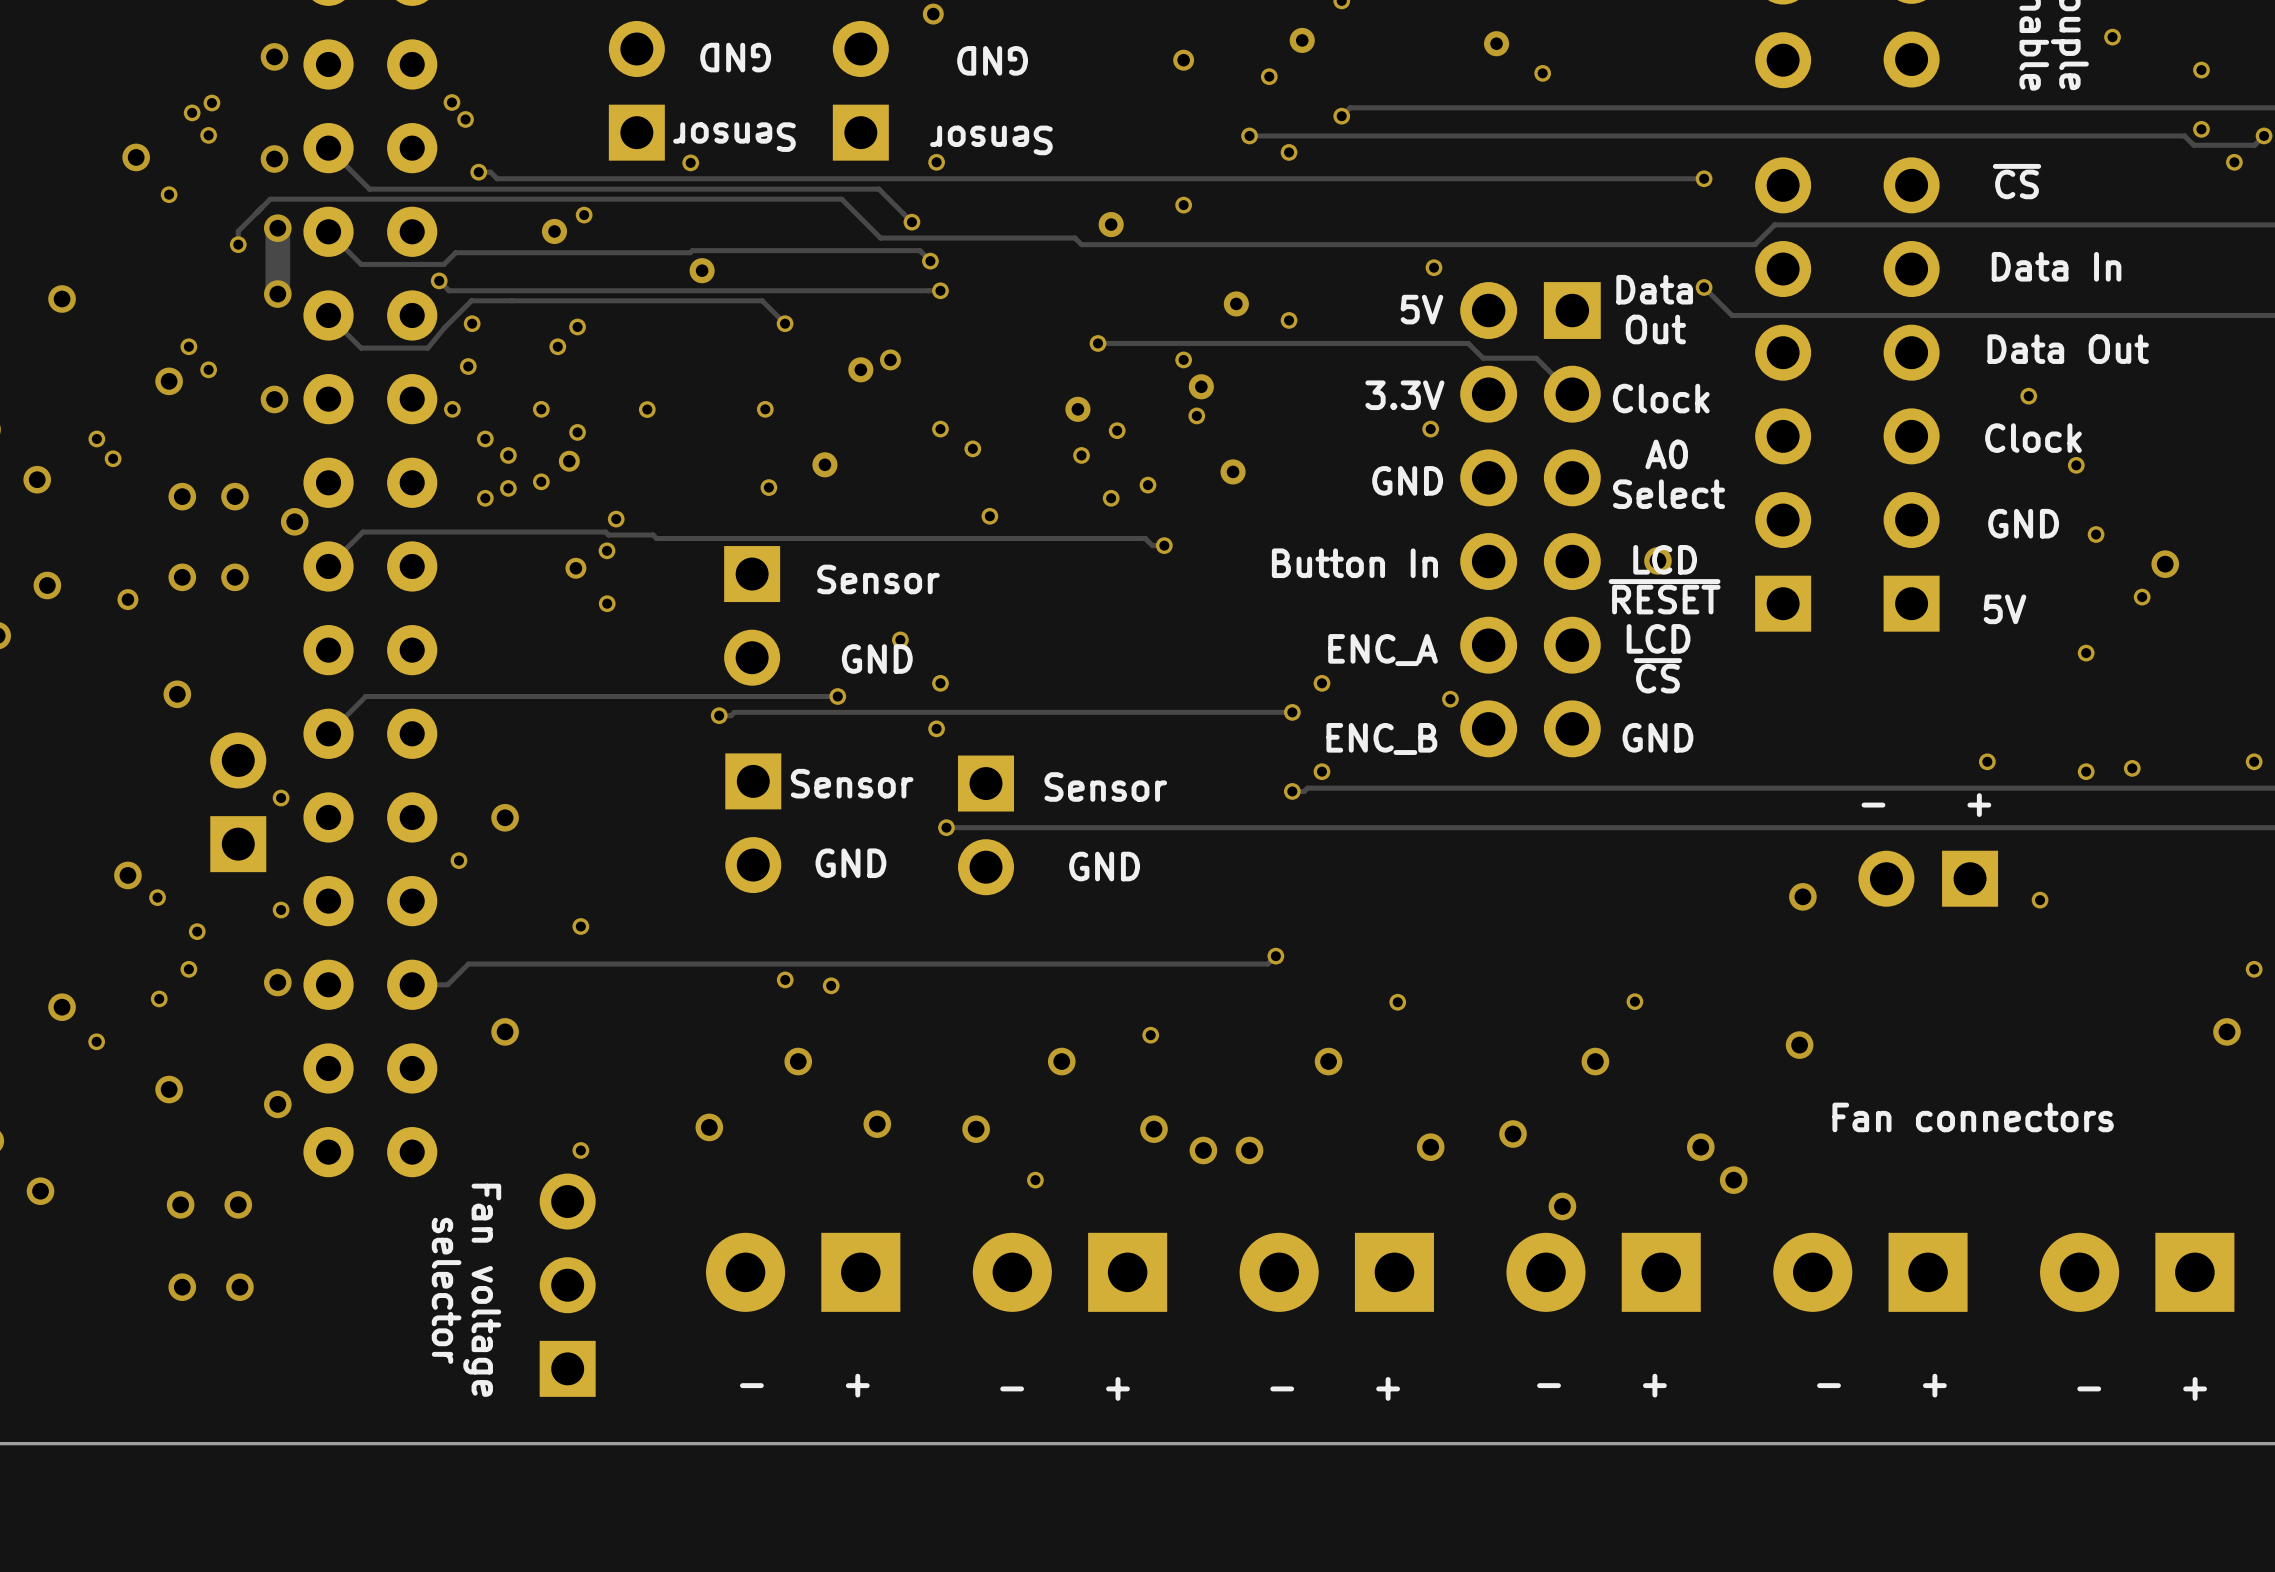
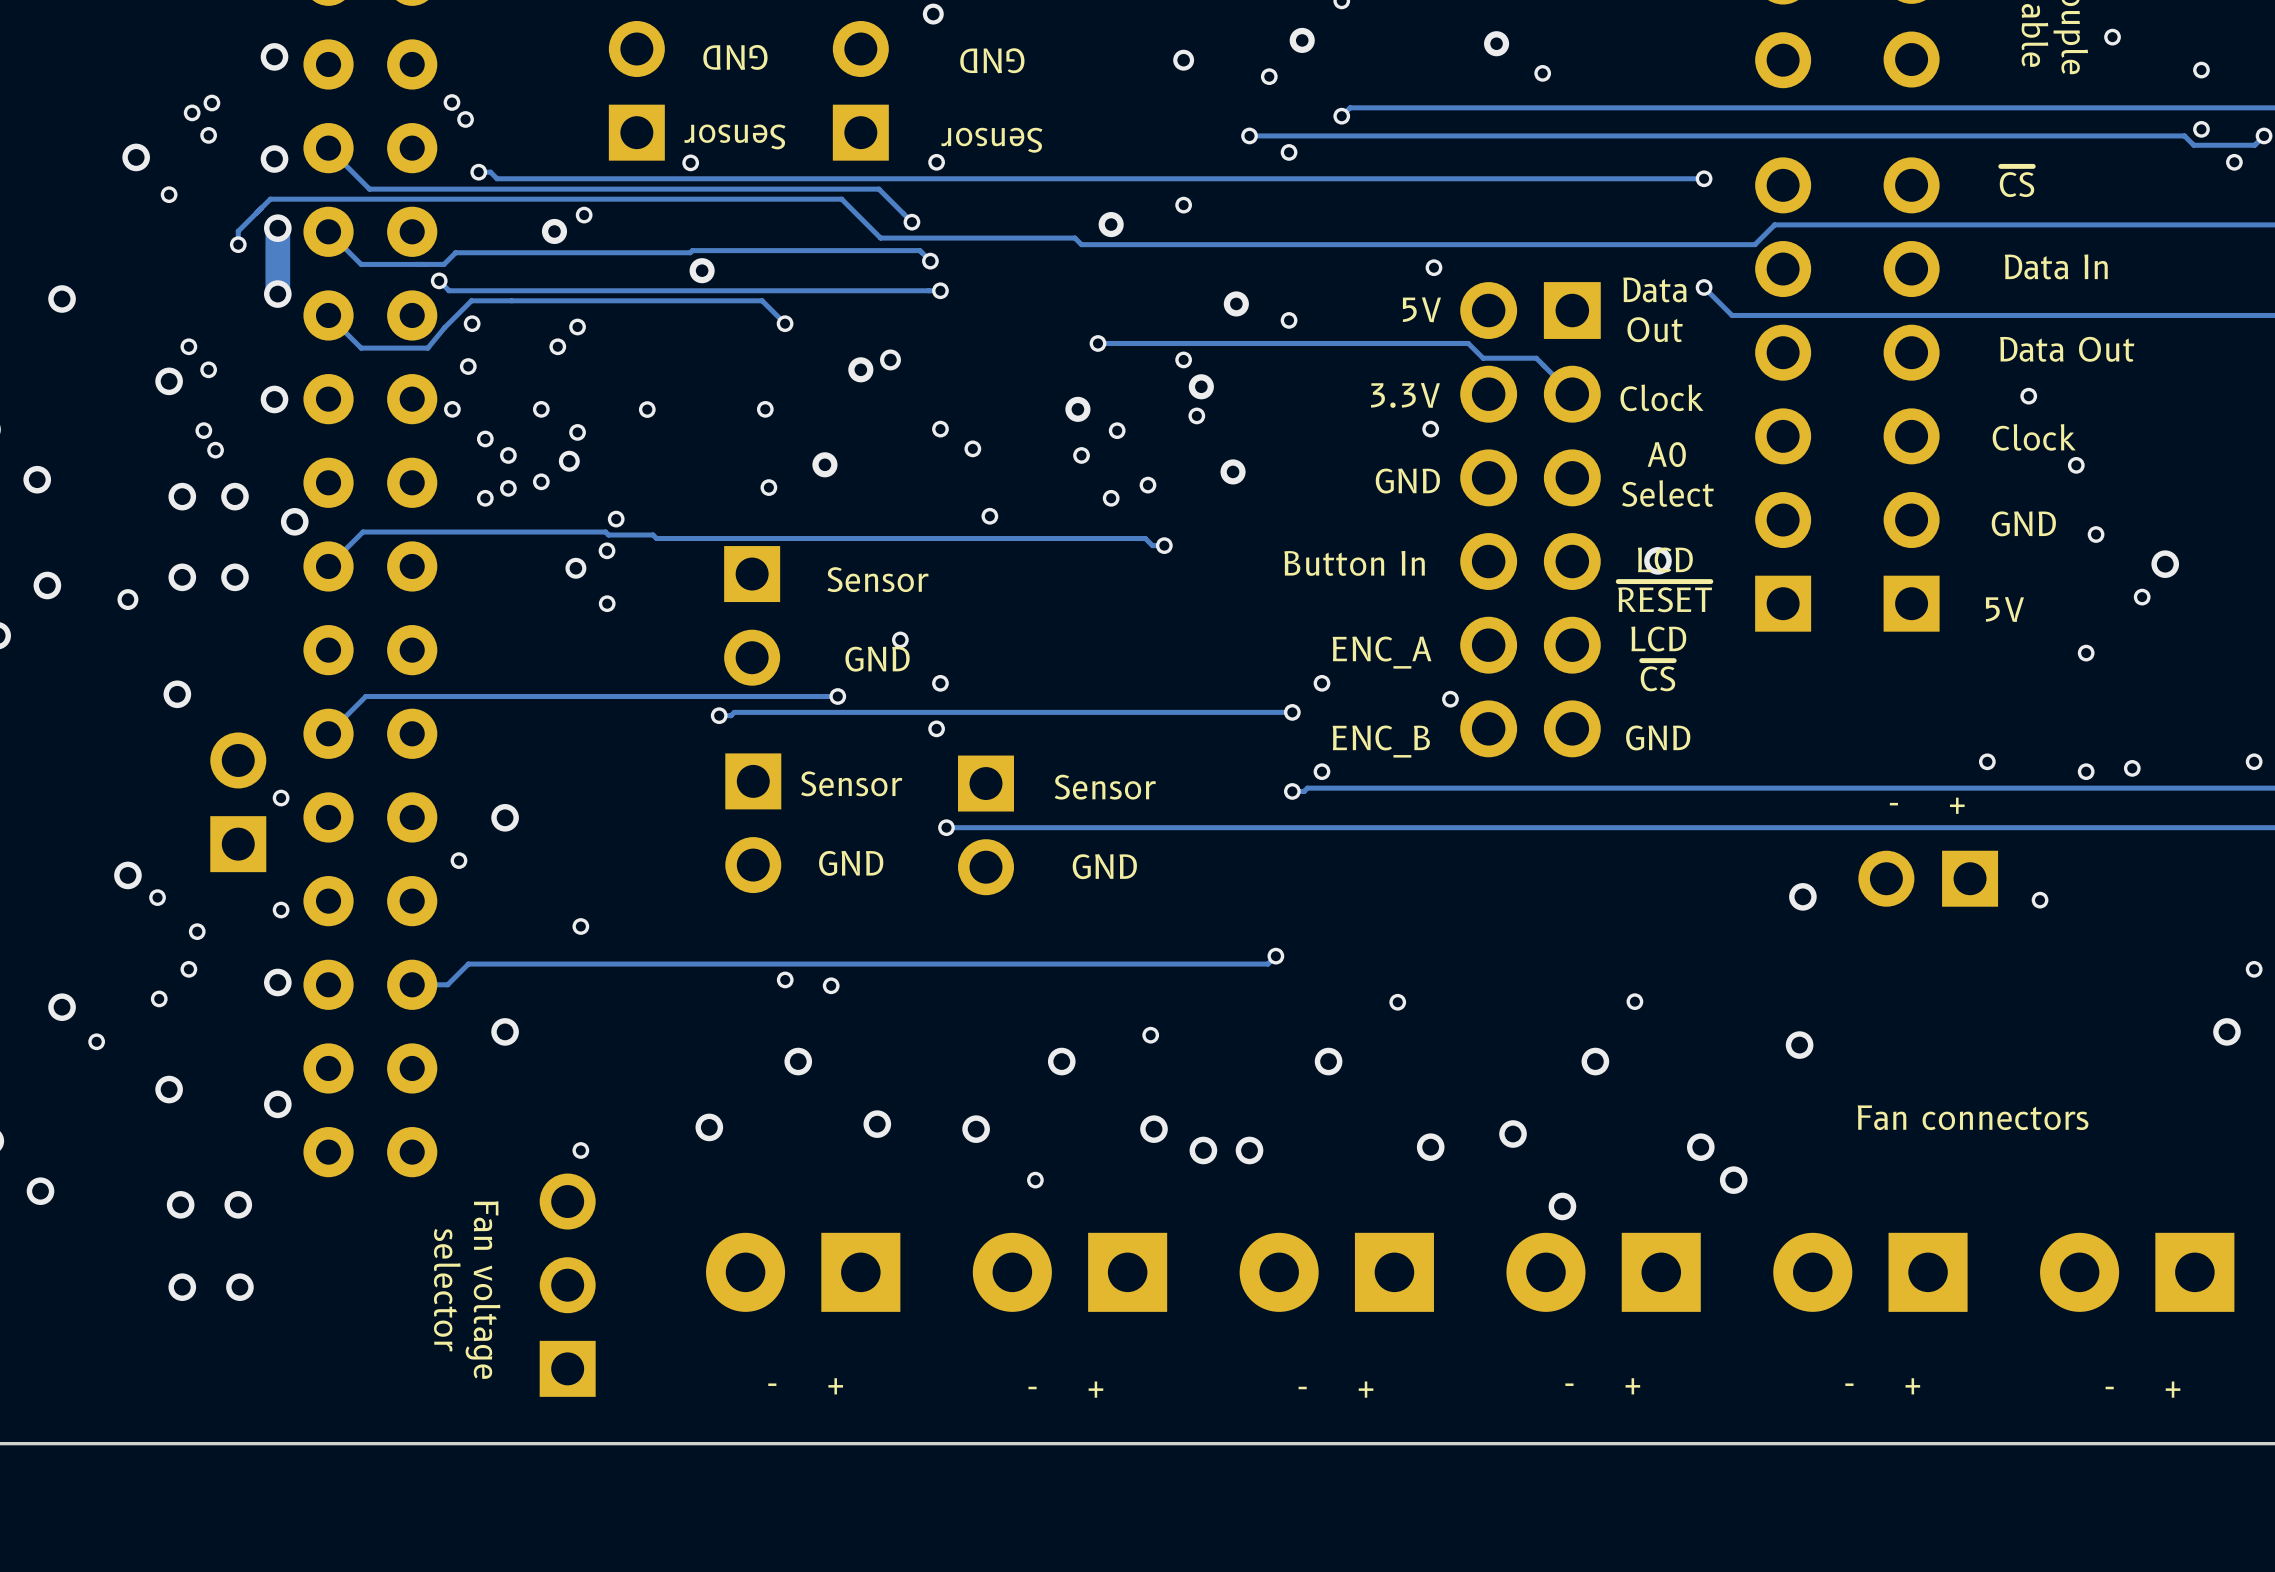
via: none -> (203, 430)
via: (96, 438) -> none
via: none -> (215, 450)
via: (113, 458) -> none

